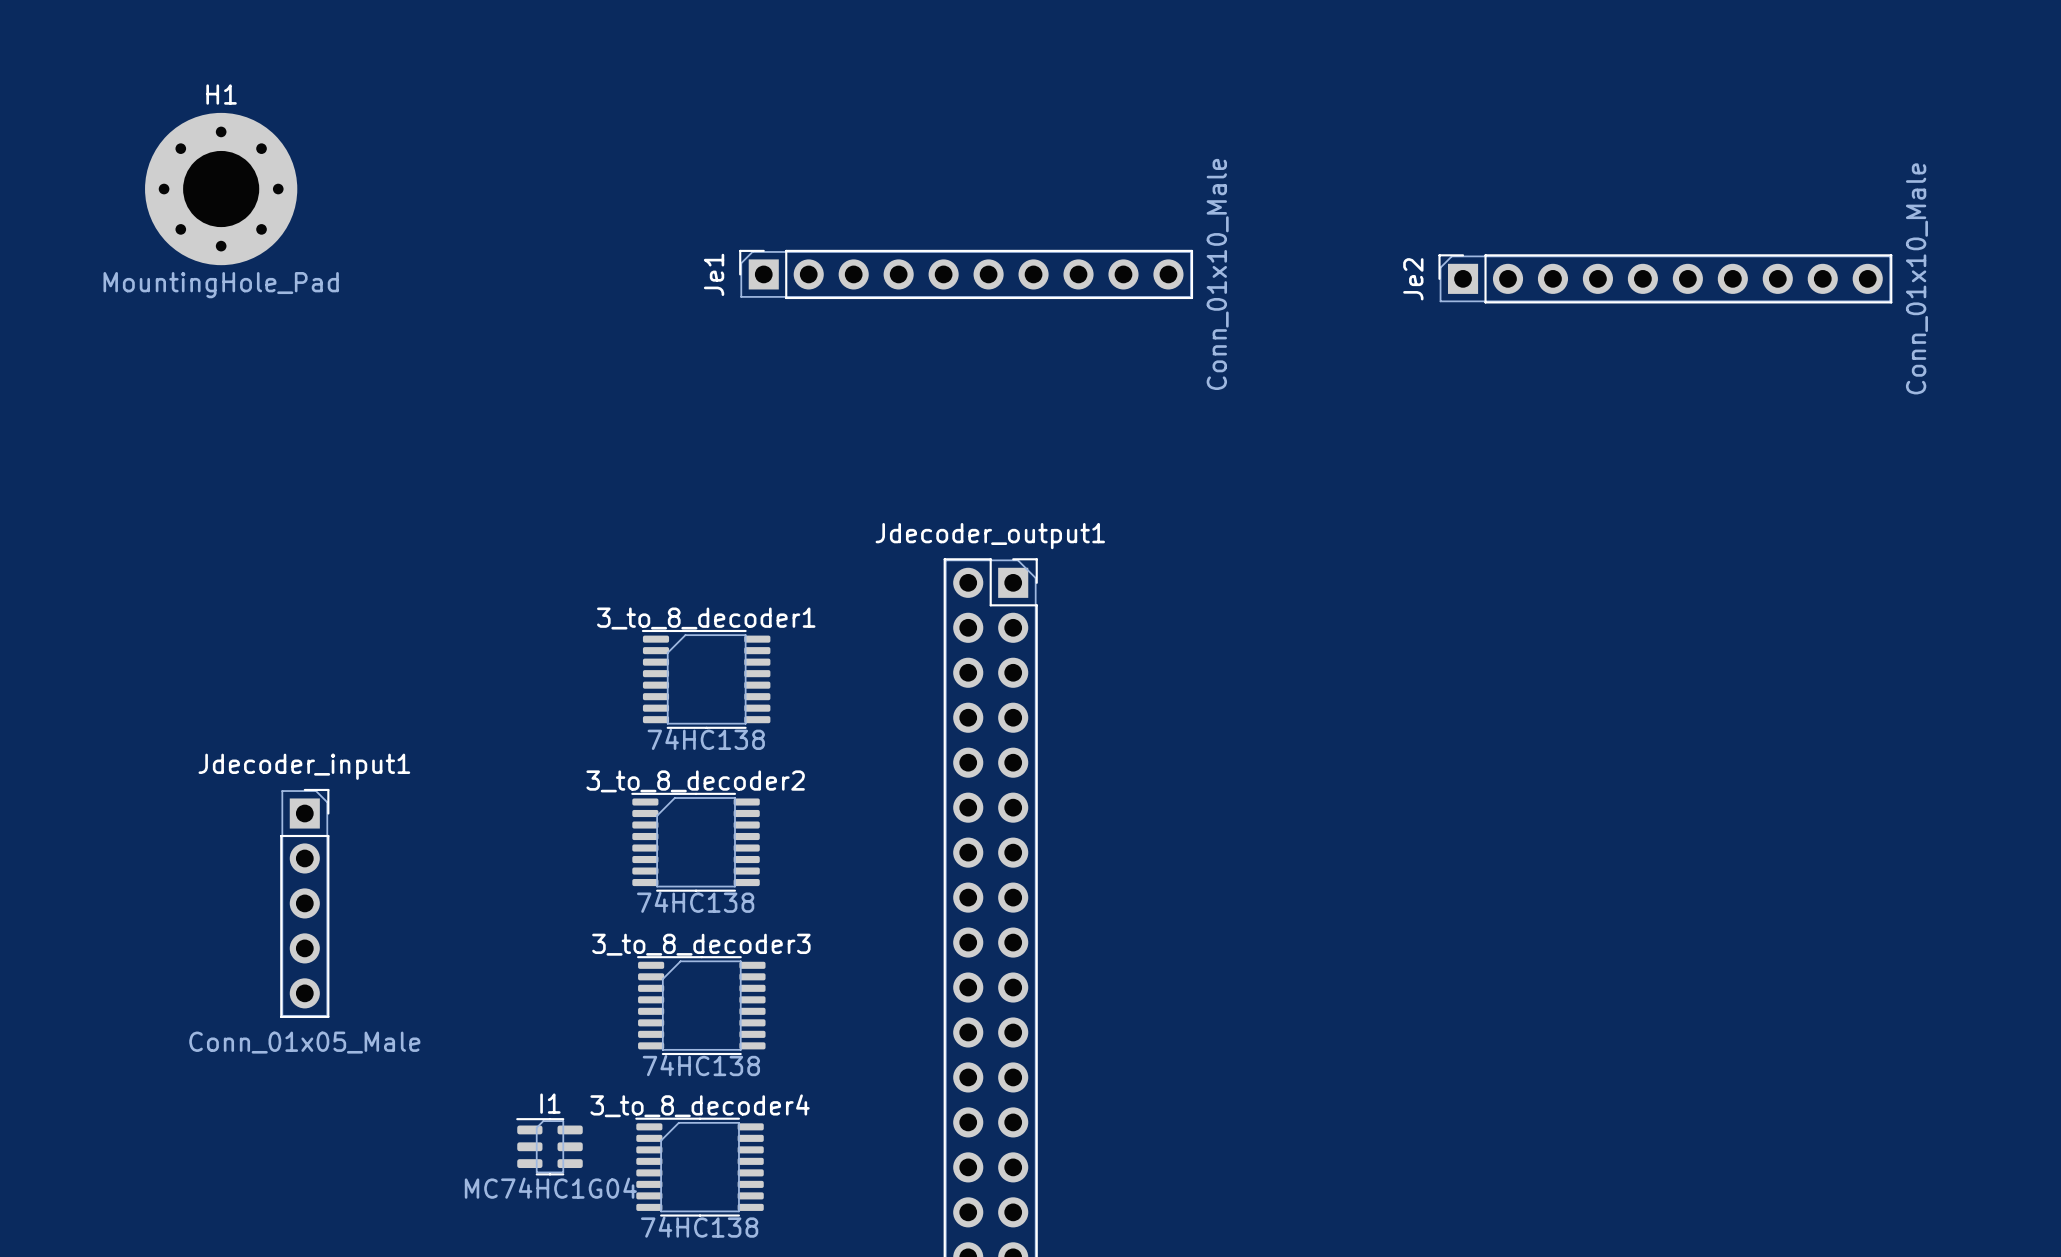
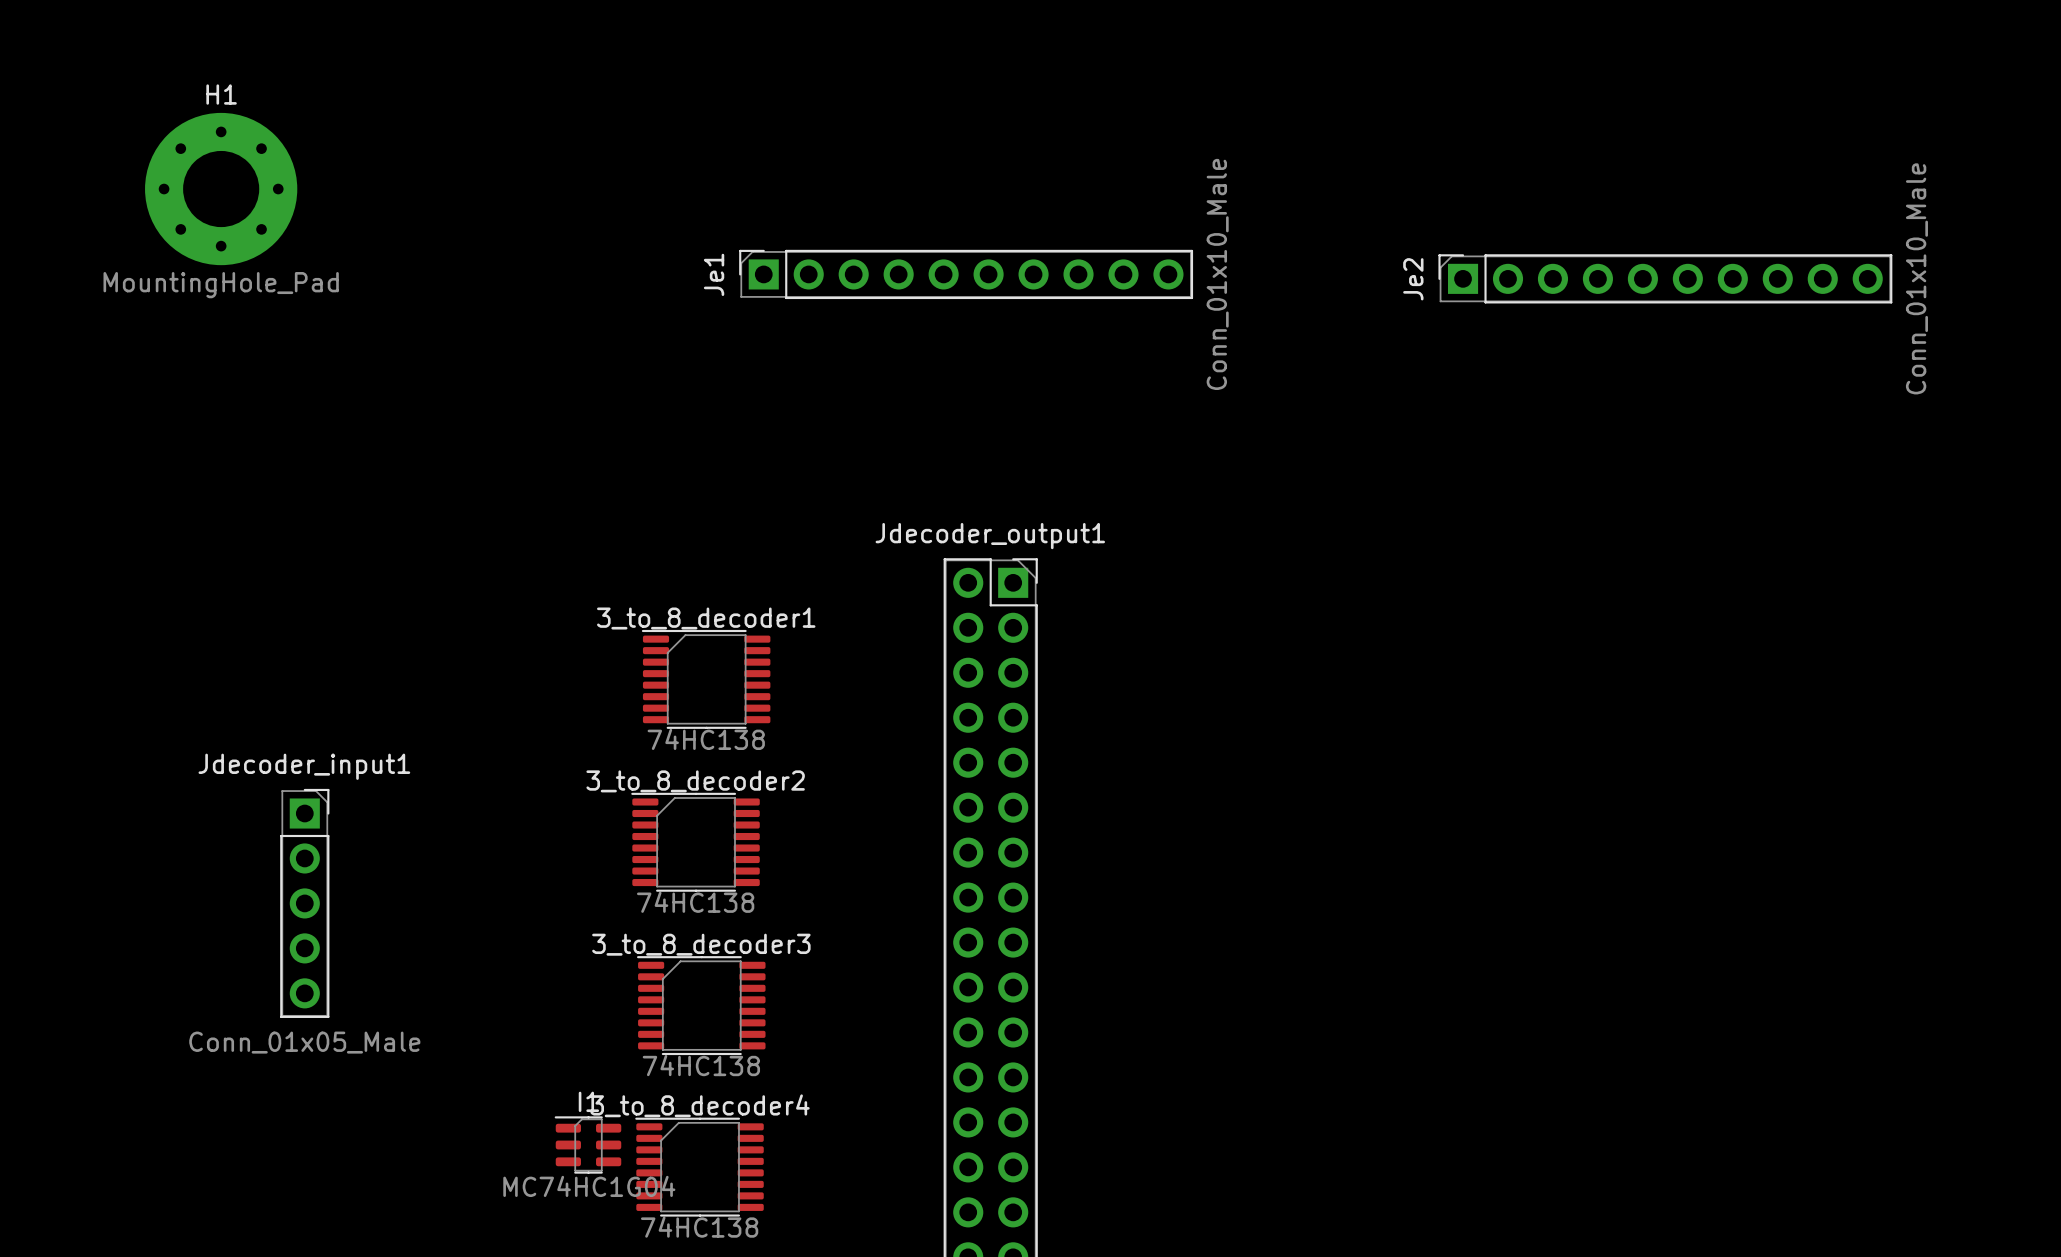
I1 position: (549, 1146) -> (587, 1145)

